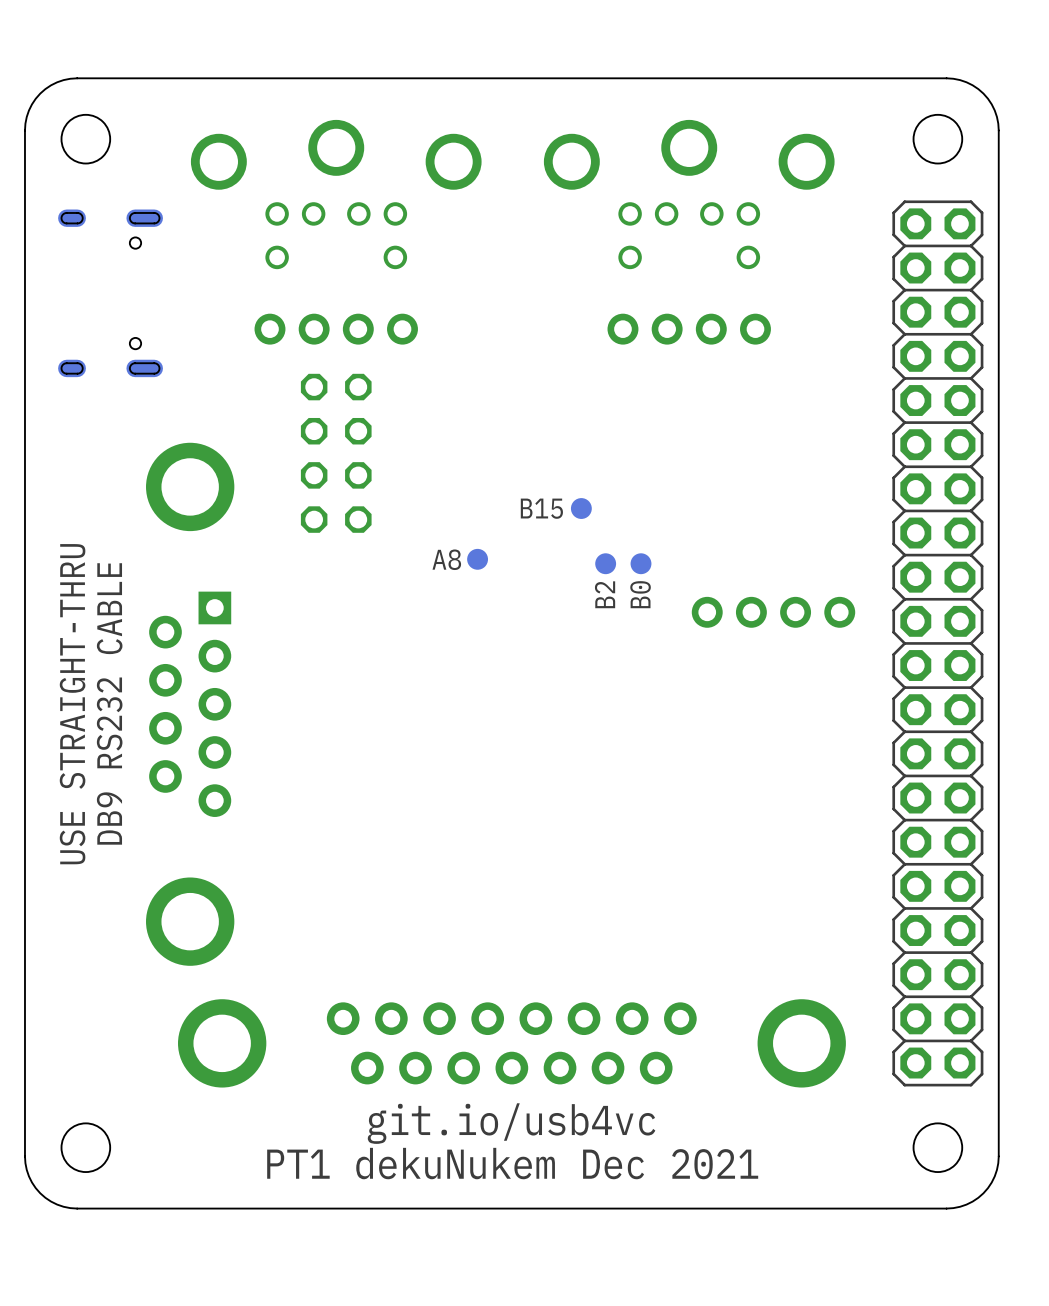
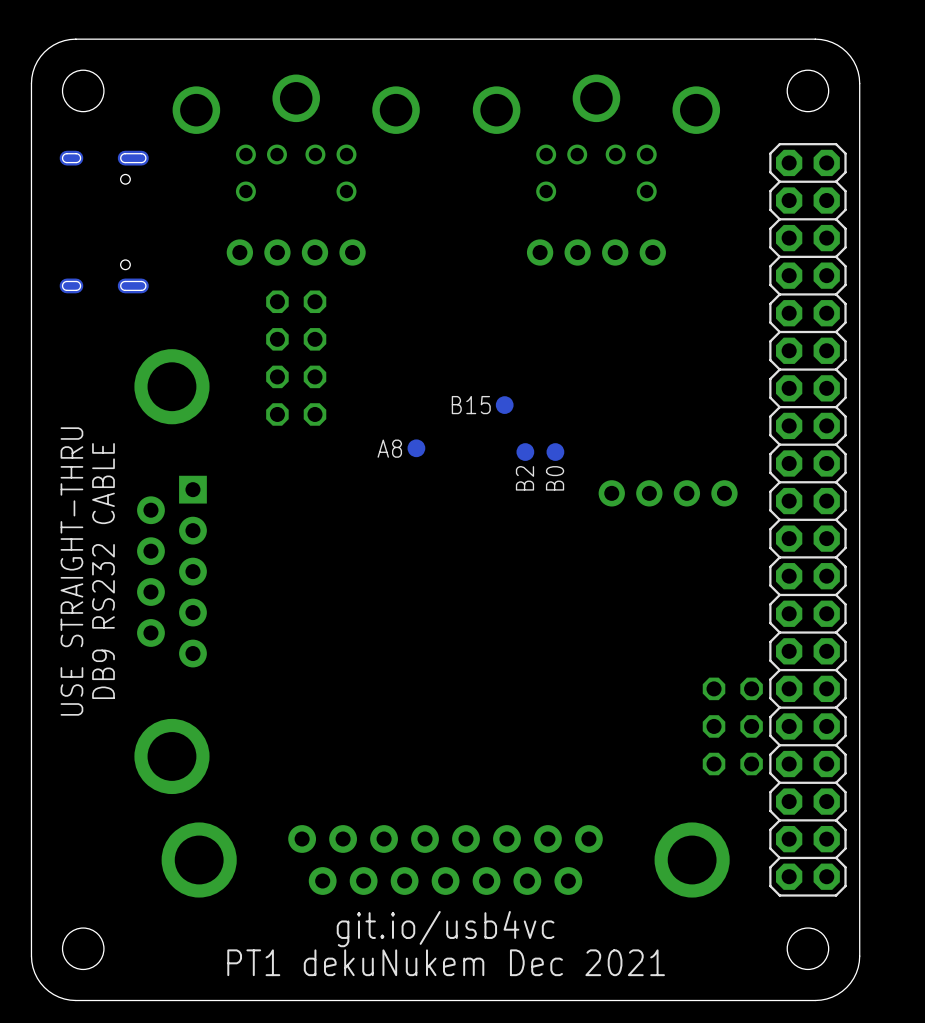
part: none -> (732, 726)

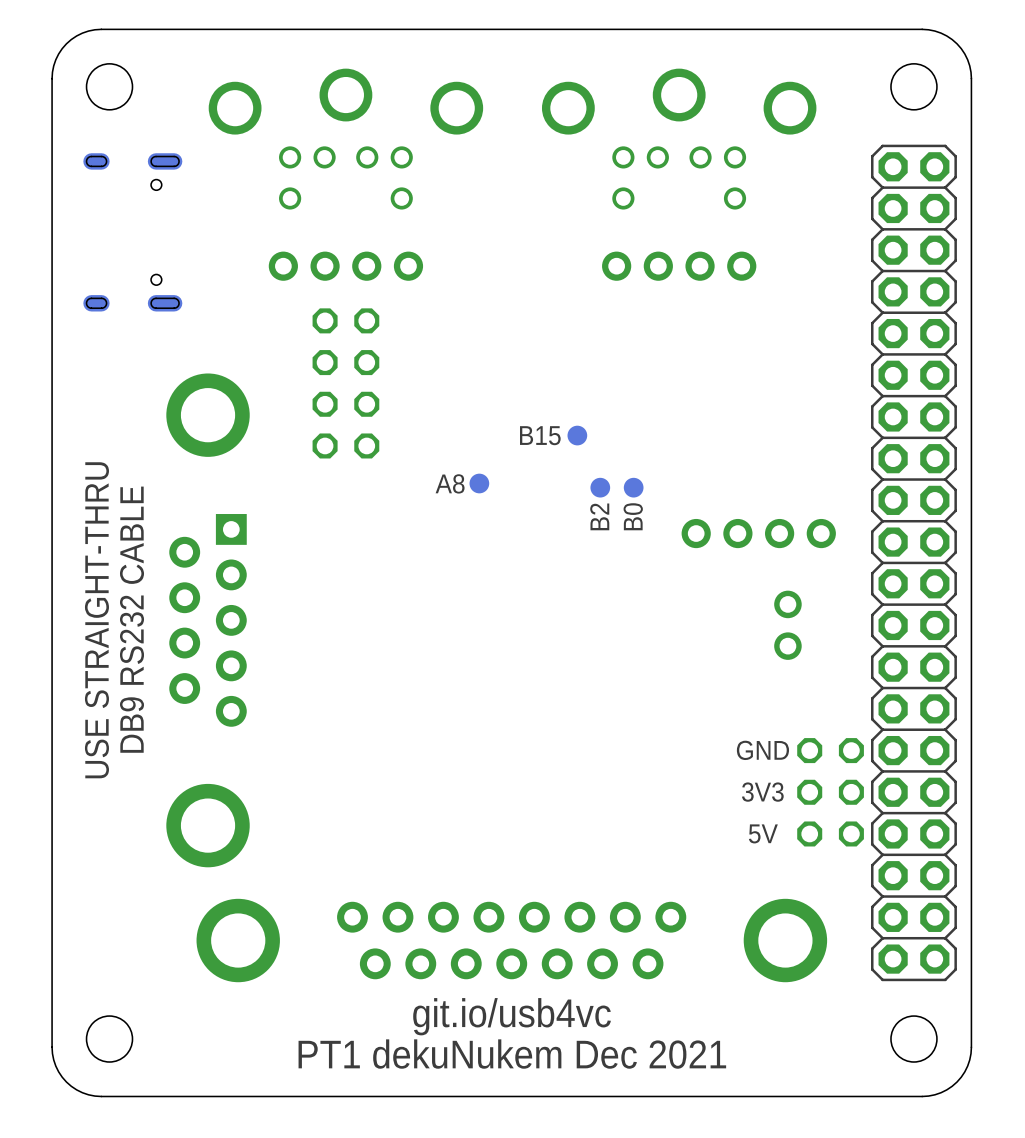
part: none -> (787, 625)
text: none -> GND (762, 750)
text: none -> 3V3 (762, 792)
text: none -> 5V (763, 833)

